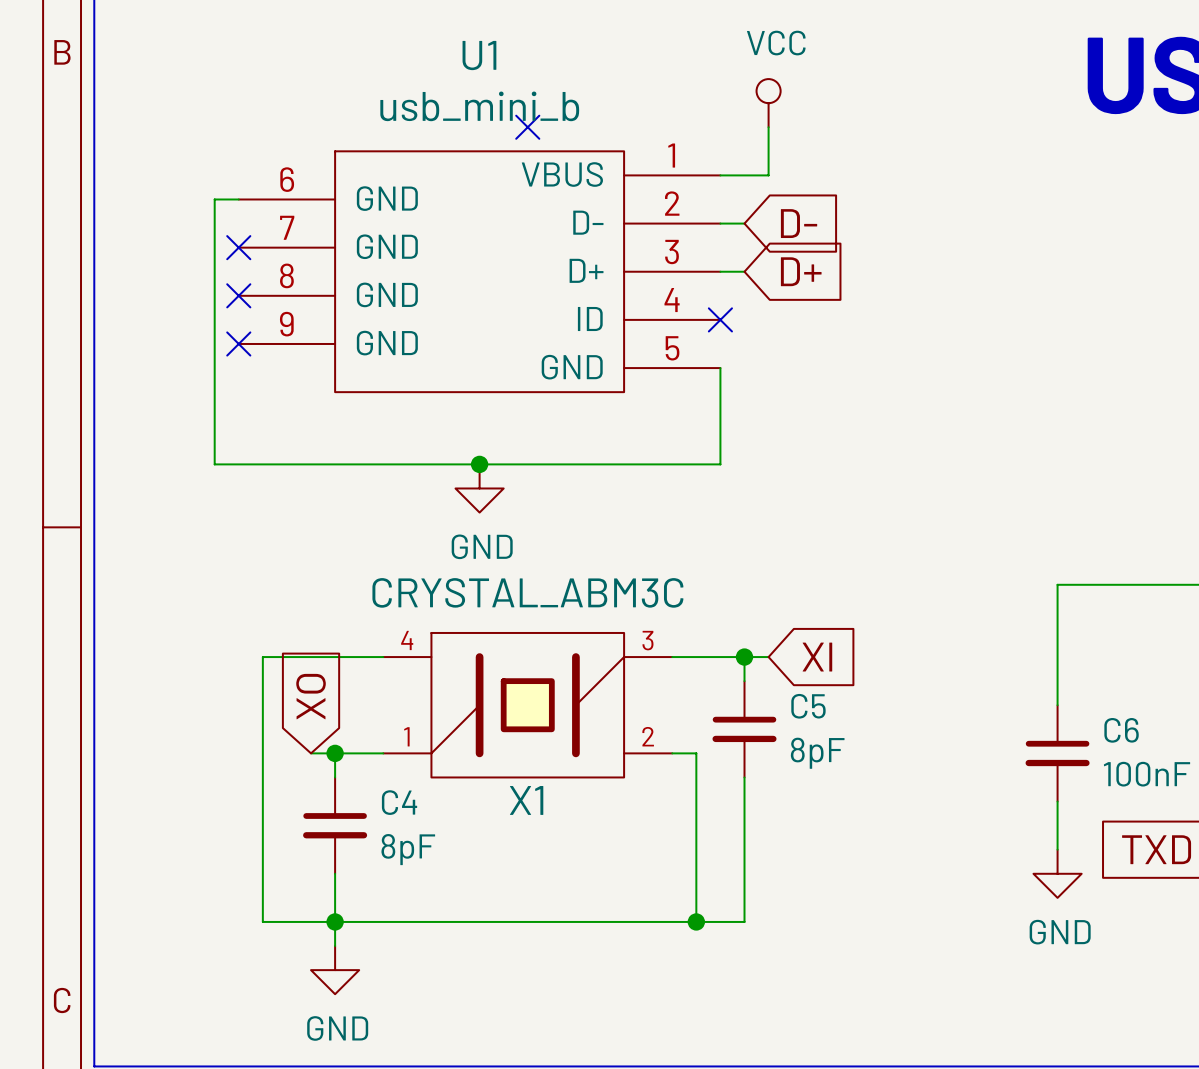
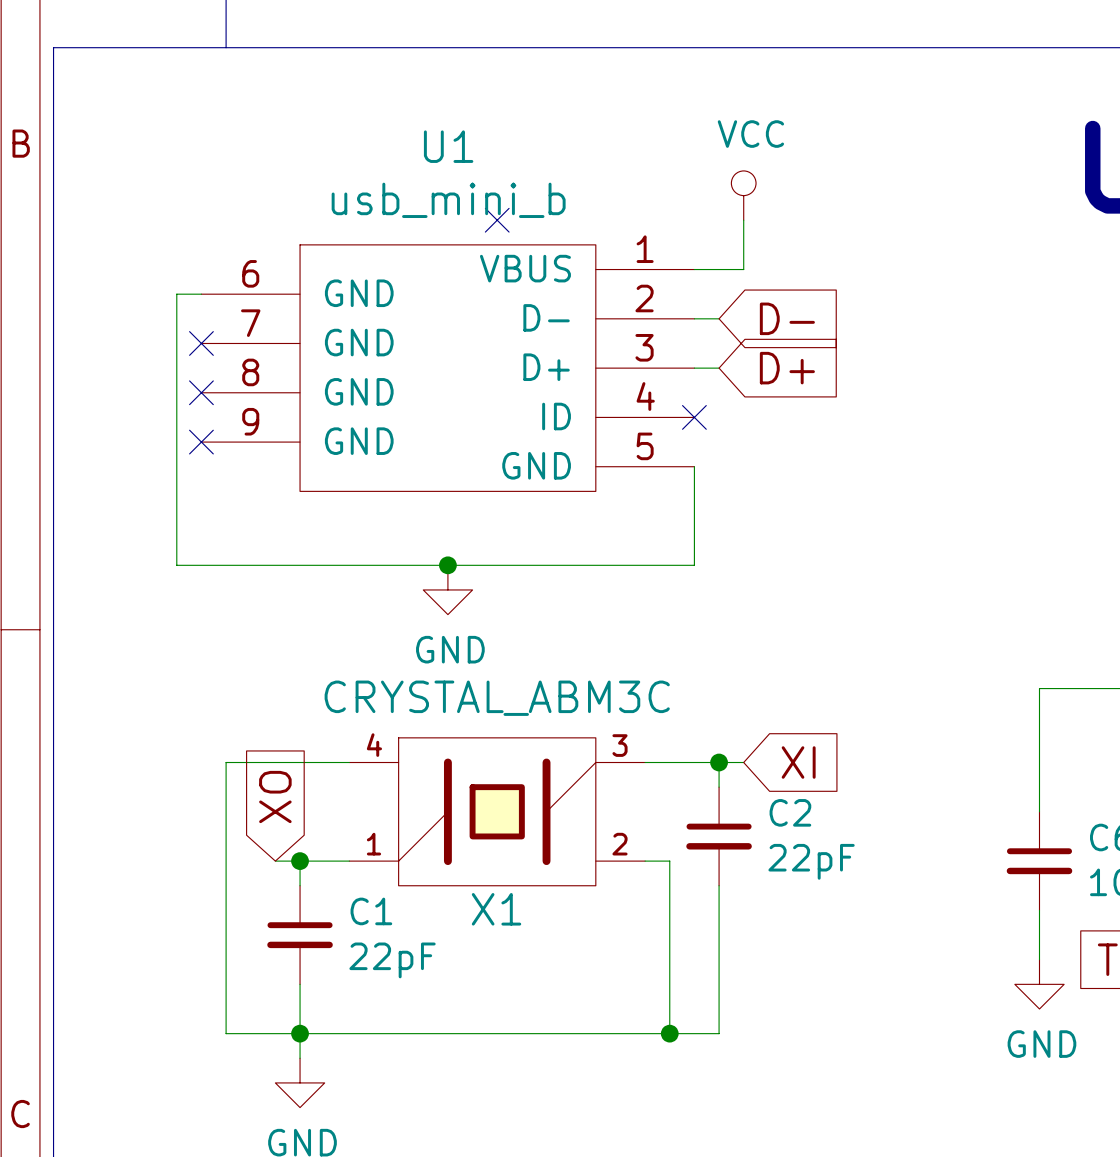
C5 name: C5 (808, 706) -> C2 (790, 812)
C5 value: 8pF (817, 753) -> 22pF (811, 861)
C4 name: C4 (399, 802) -> C1 (371, 911)
C4 value: 8pF (408, 849) -> 22pF (392, 960)

